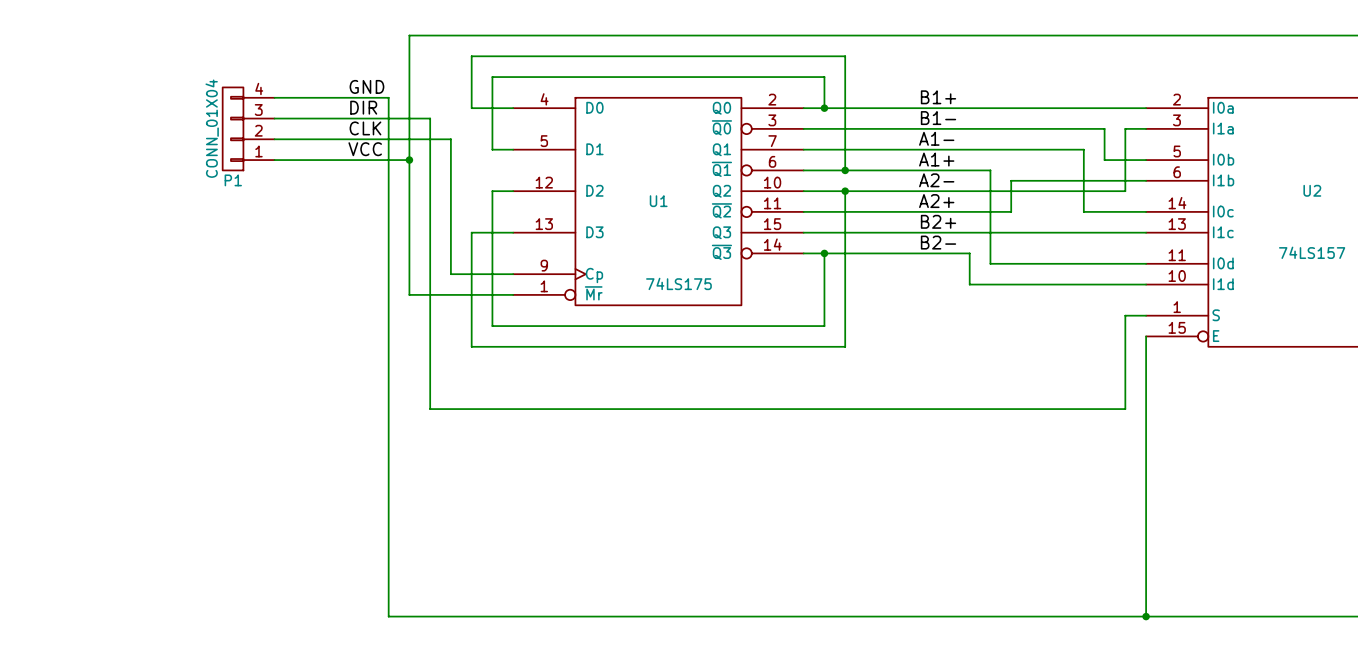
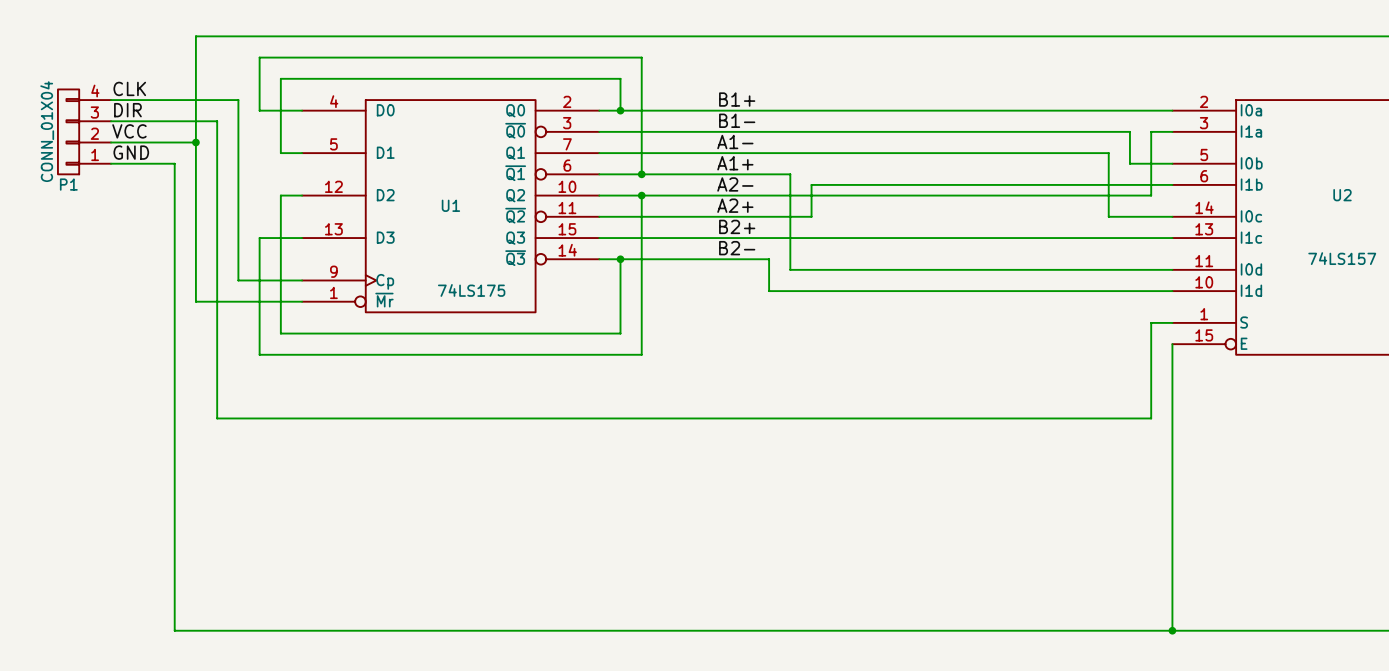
wire: (409, 35) (409, 294) (513, 294) -> (418, 36) (195, 36) (195, 301) (302, 301)
wire: (471, 56) (471, 108) (513, 108) -> (482, 57) (259, 57) (259, 110) (302, 110)
wire: (627, 56) (845, 56) (845, 170) -> (641, 57) (641, 174)
wire: (492, 77) (492, 149) (513, 149) -> (503, 78) (280, 78) (280, 153) (302, 153)
wire: (606, 77) (824, 77) (824, 108) -> (620, 78) (620, 110)
label: none -> CLK (129, 88)
label: GND (366, 86) -> none
wire: none -> (111, 100) (238, 100) (238, 280) (302, 280)
wire: (274, 97) (388, 97) (388, 616) -> (111, 163) (174, 163) (174, 630) (397, 630)
label: none -> B1+ (737, 99)
label: B1+ (938, 97) -> none
label: none -> DIR (127, 110)
label: DIR (363, 107) -> none
wire: none -> (599, 110) (822, 110)
junction: none -> (620, 110)
junction: (824, 108) -> none
wire: (274, 118) (430, 118) (430, 409) -> (111, 121) (217, 121) (217, 418) (440, 418)
label: none -> B1- (737, 120)
label: B1- (938, 118) -> none
label: none -> VCC (129, 131)
P1 position: (248, 128) -> (84, 131)
label: CLK (365, 128) -> none
wire: none -> (599, 131) (822, 131)
label: none -> A1- (735, 142)
label: A1- (936, 138) -> none
wire: none -> (111, 142) (195, 142)
junction: none -> (195, 142)
wire: (274, 139) (450, 139) (450, 274) (513, 274) -> none
label: none -> GND (131, 152)
label: VCC (365, 149) -> none
wire: none -> (599, 153) (822, 153)
label: none -> A1+ (735, 163)
label: A1+ (936, 159) -> none
wire: (274, 160) (409, 160) -> none
junction: (409, 160) -> none
junction: none -> (641, 174)
wire: (803, 170) (990, 170) (990, 263) -> (599, 174) (790, 174) (790, 269) (1013, 269)
junction: (845, 170) -> none
label: none -> A2- (735, 184)
label: A2- (936, 180) -> none
wire: (1011, 180) (1011, 211) (803, 211) -> (1034, 184) (811, 184) (811, 216) (599, 216)
wire: (513, 191) (492, 191) (492, 326) -> (302, 195) (280, 195) (280, 333) (503, 333)
wire: none -> (599, 195) (822, 195)
junction: none -> (641, 195)
wire: (845, 191) (845, 346) (627, 346) -> (641, 195) (641, 354)
junction: (845, 191) -> none
U1 position: (658, 201) -> (450, 206)
label: none -> A2+ (735, 205)
label: A2+ (936, 201) -> none
label: none -> B2+ (737, 226)
label: B2+ (938, 221) -> none
wire: (513, 232) (471, 232) (471, 346) -> (302, 238) (259, 238) (259, 354) (482, 354)
wire: none -> (599, 238) (822, 238)
label: none -> B2- (737, 248)
label: B2- (938, 242) -> none
junction: none -> (620, 259)
wire: (803, 253) (969, 253) (969, 284) -> (599, 259) (769, 259) (769, 291) (991, 291)
wire: (824, 253) (824, 326) (606, 326) -> (620, 259) (620, 333)
junction: (824, 253) -> none

